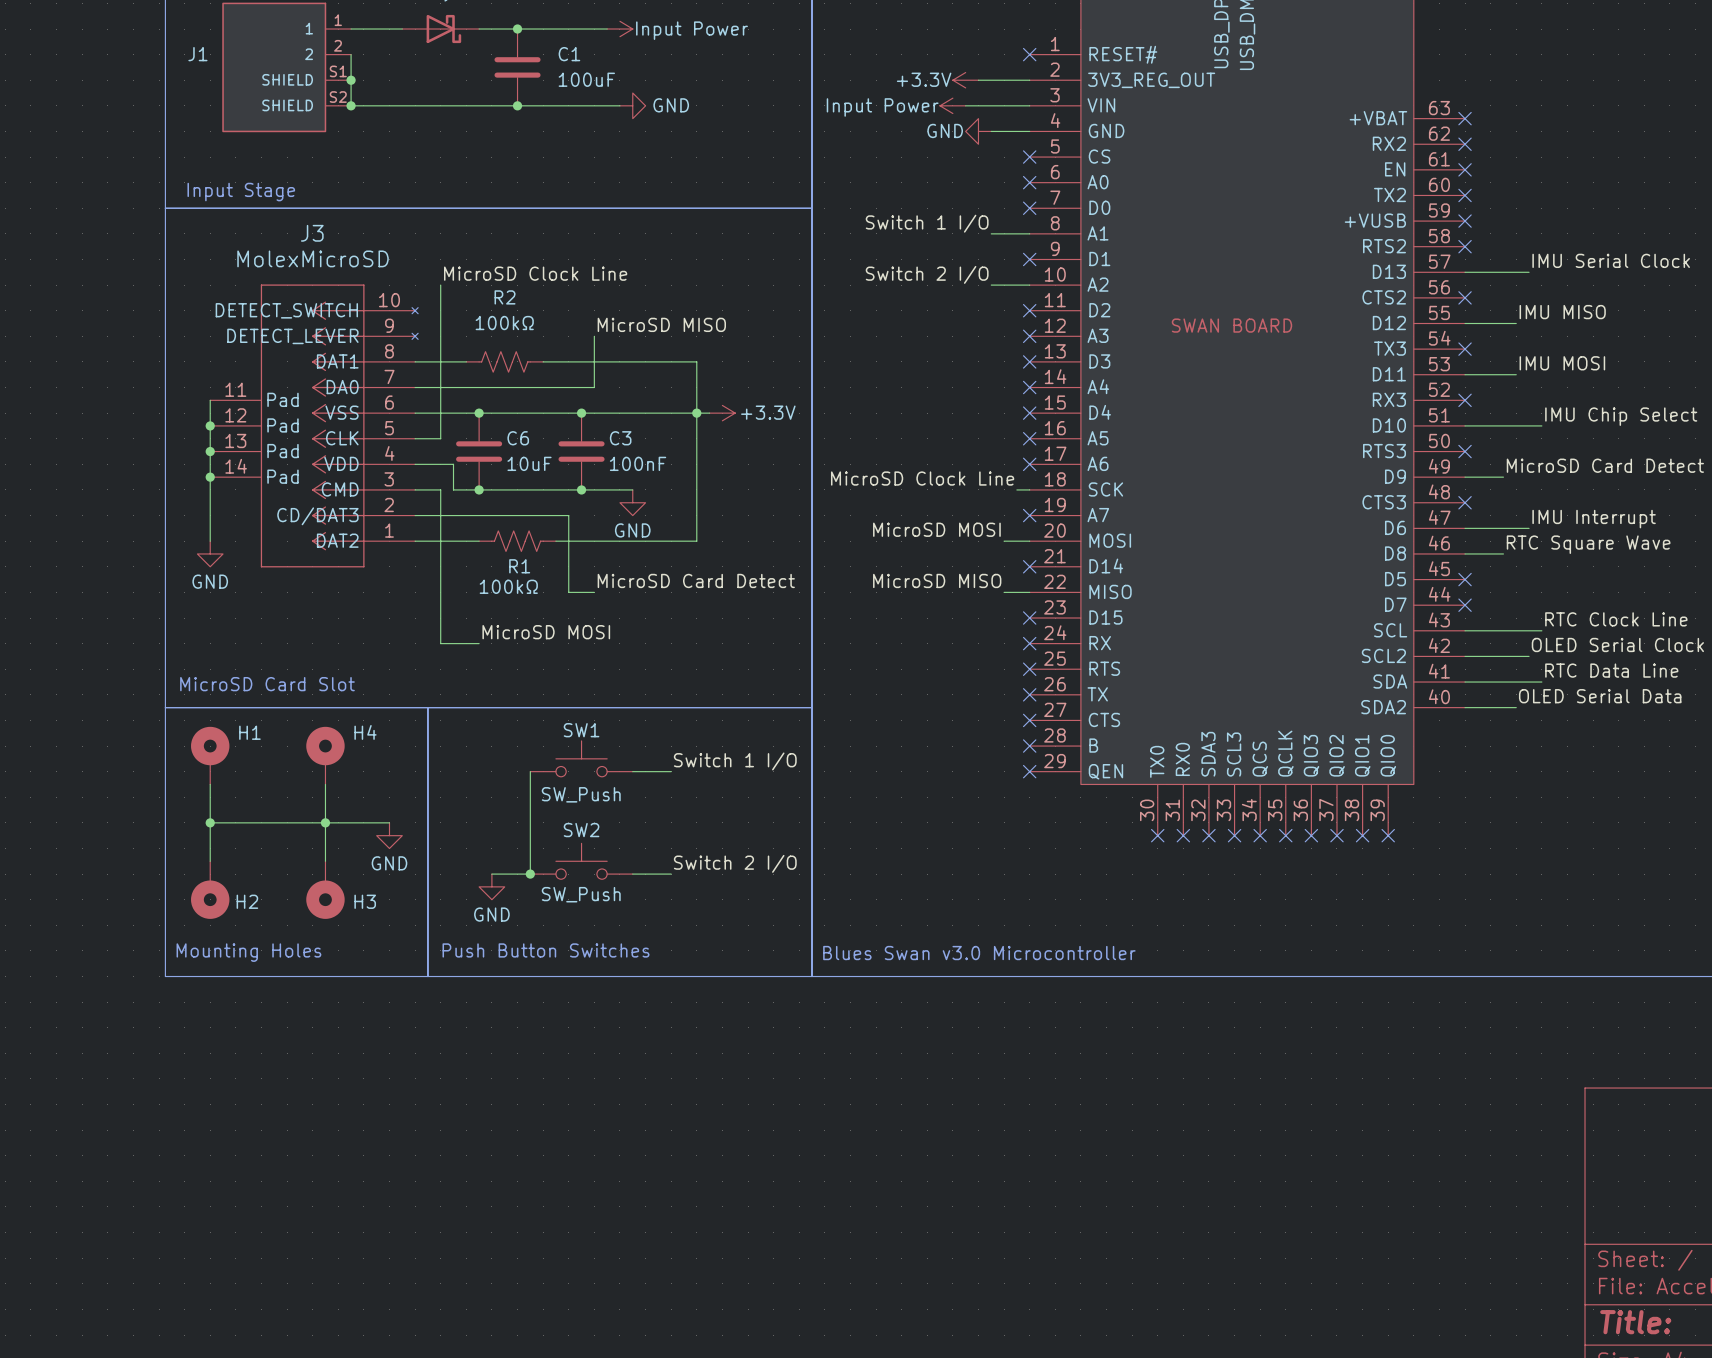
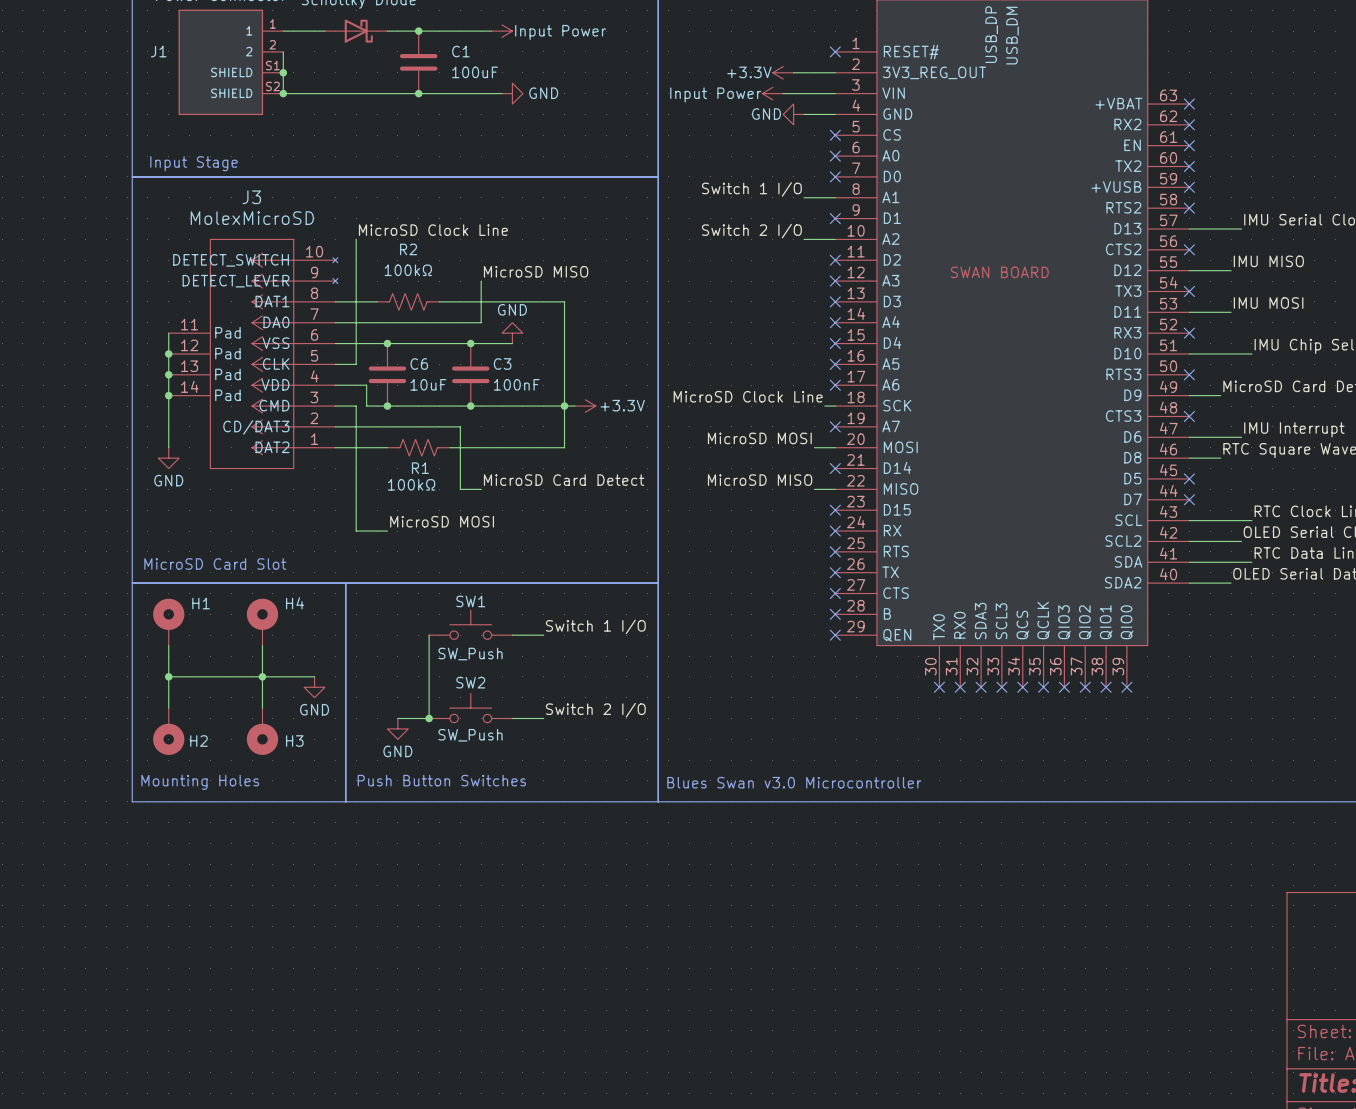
wire: (632, 413) (709, 413) -> (512, 406) (574, 406)
junction: (696, 413) -> none
power symbol position: +3.3V (722, 413) -> +3.3V (585, 406)
junction: none -> (564, 406)
power symbol rotation: 0° (632, 502) -> 180° (512, 333)
power symbol position: GND (632, 502) -> GND (512, 333)

